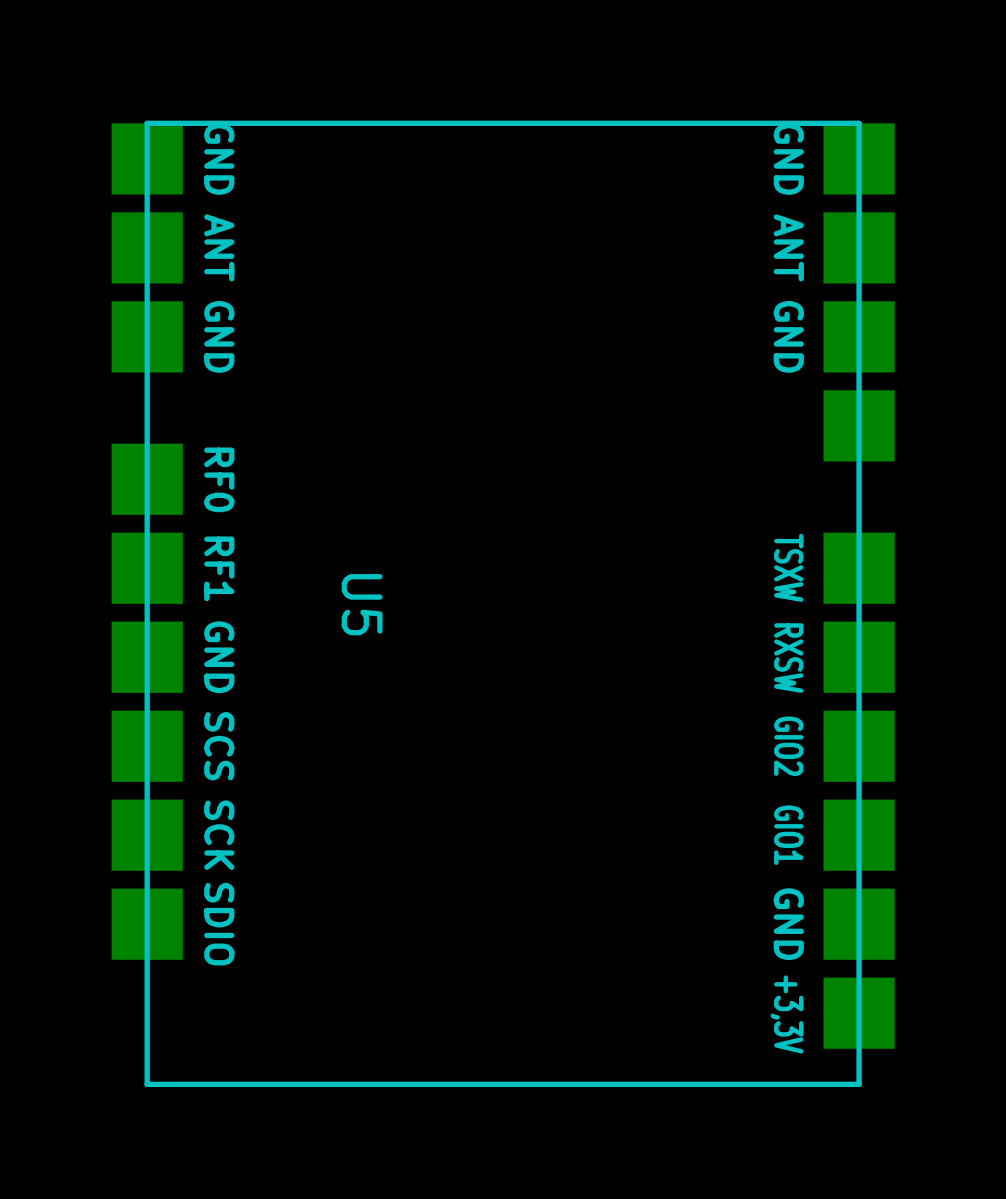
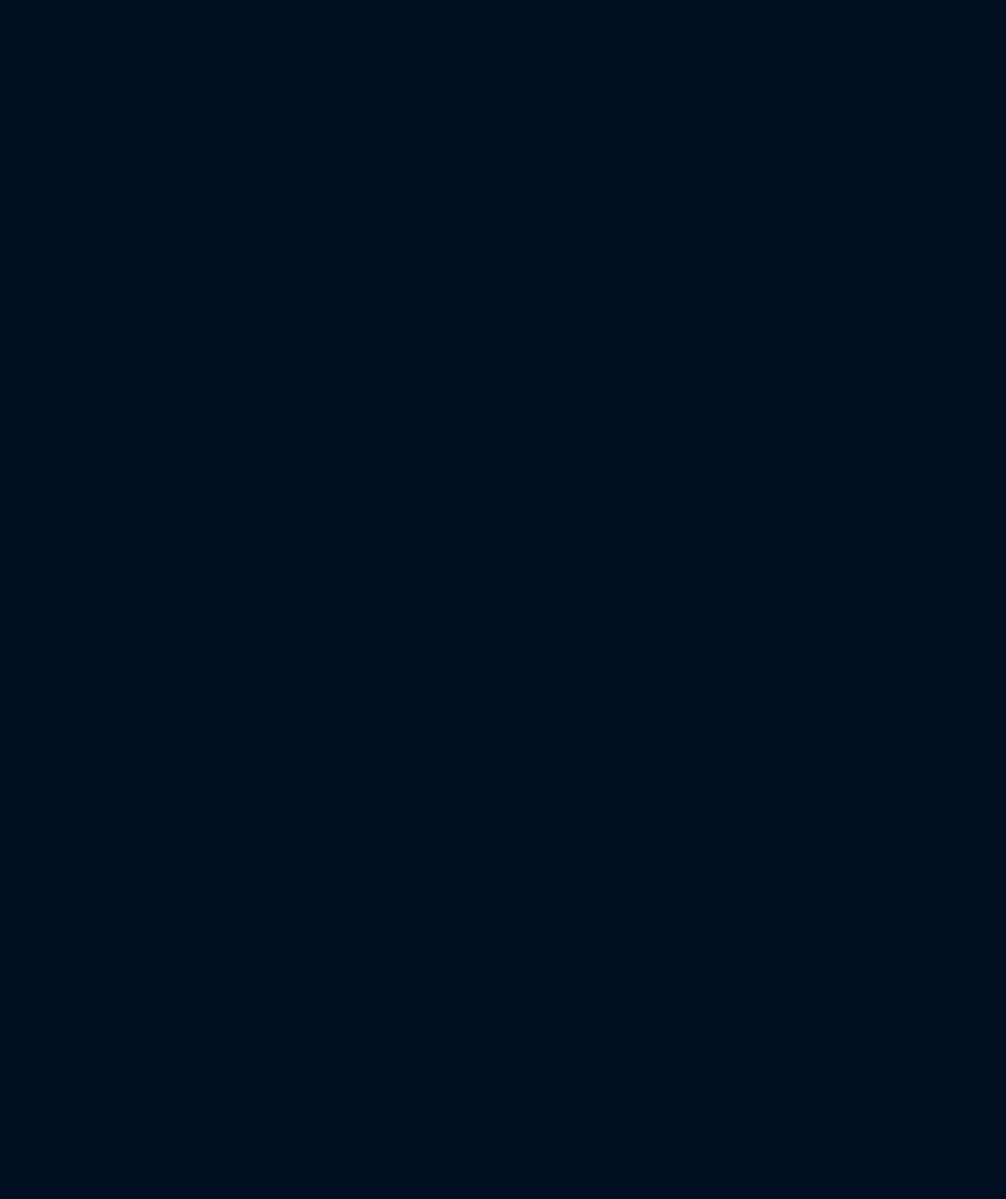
U5: (503, 603) -> none

